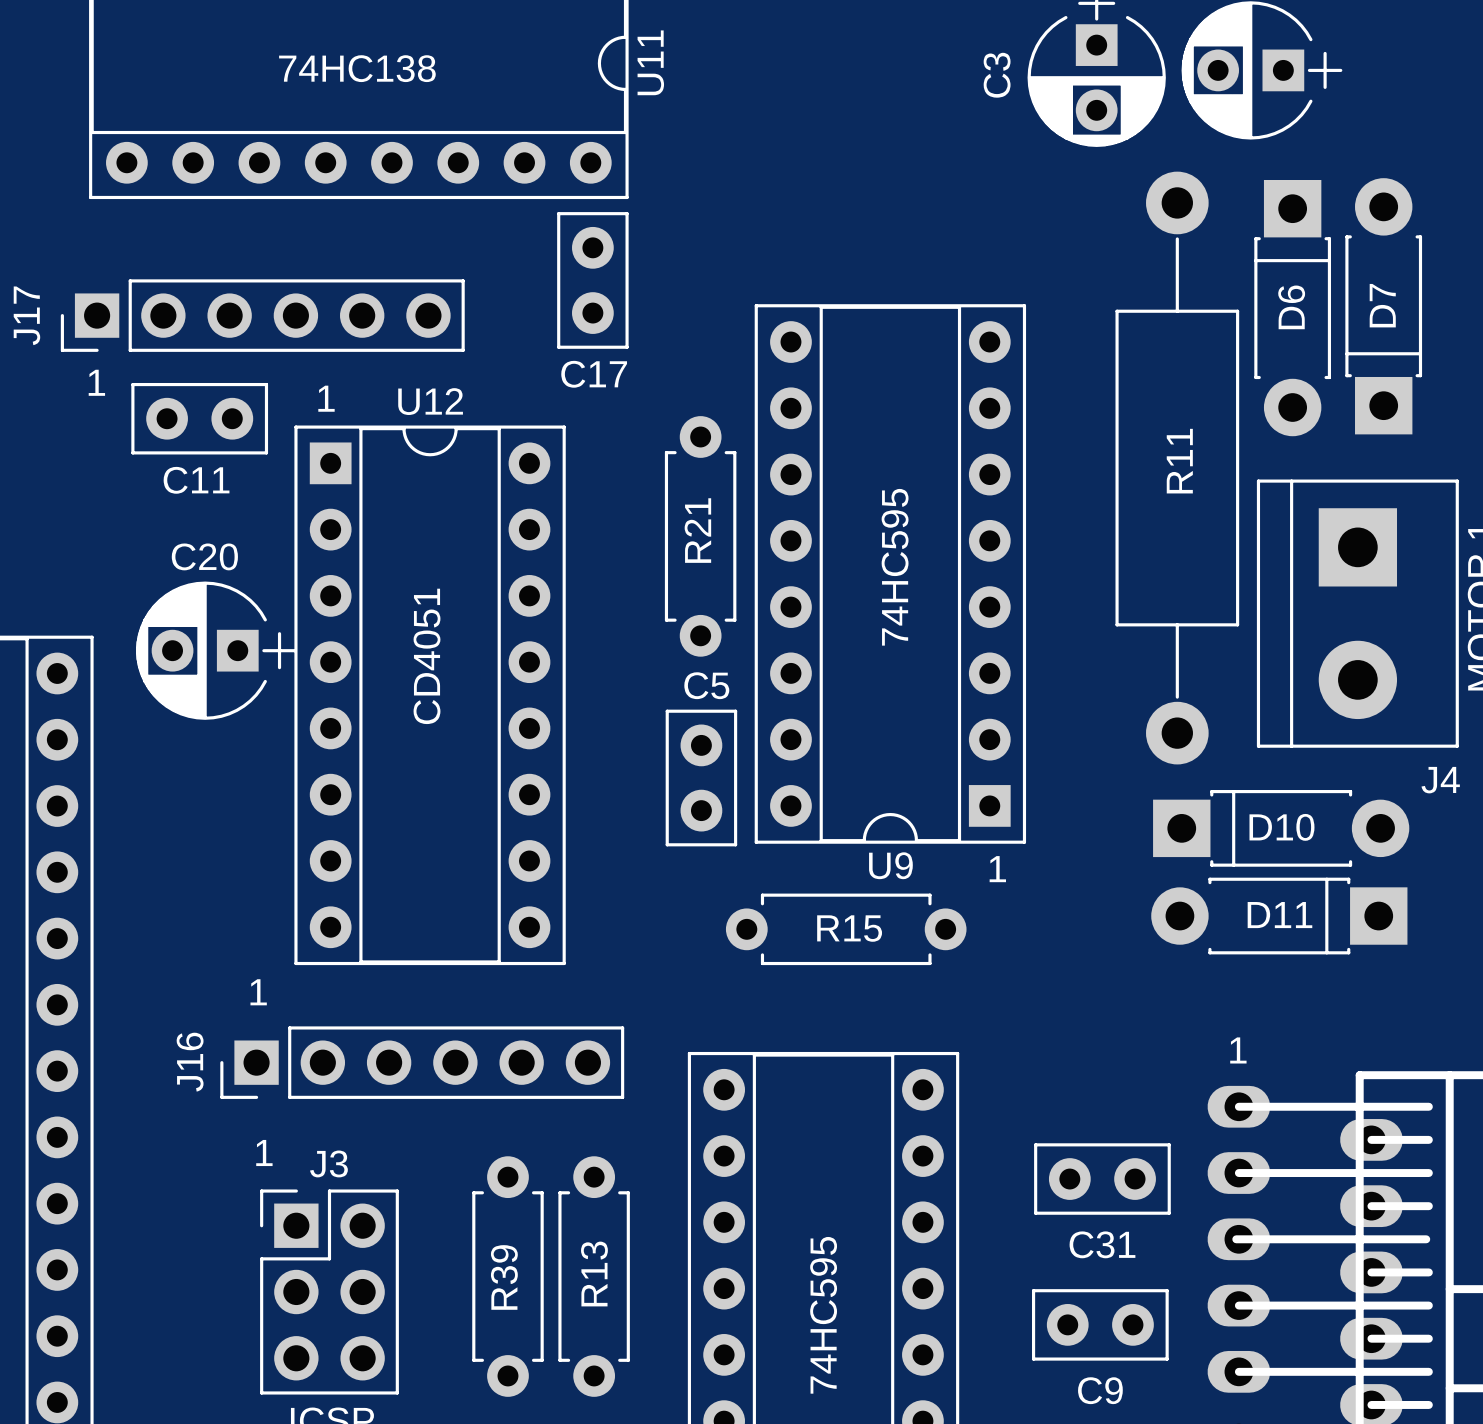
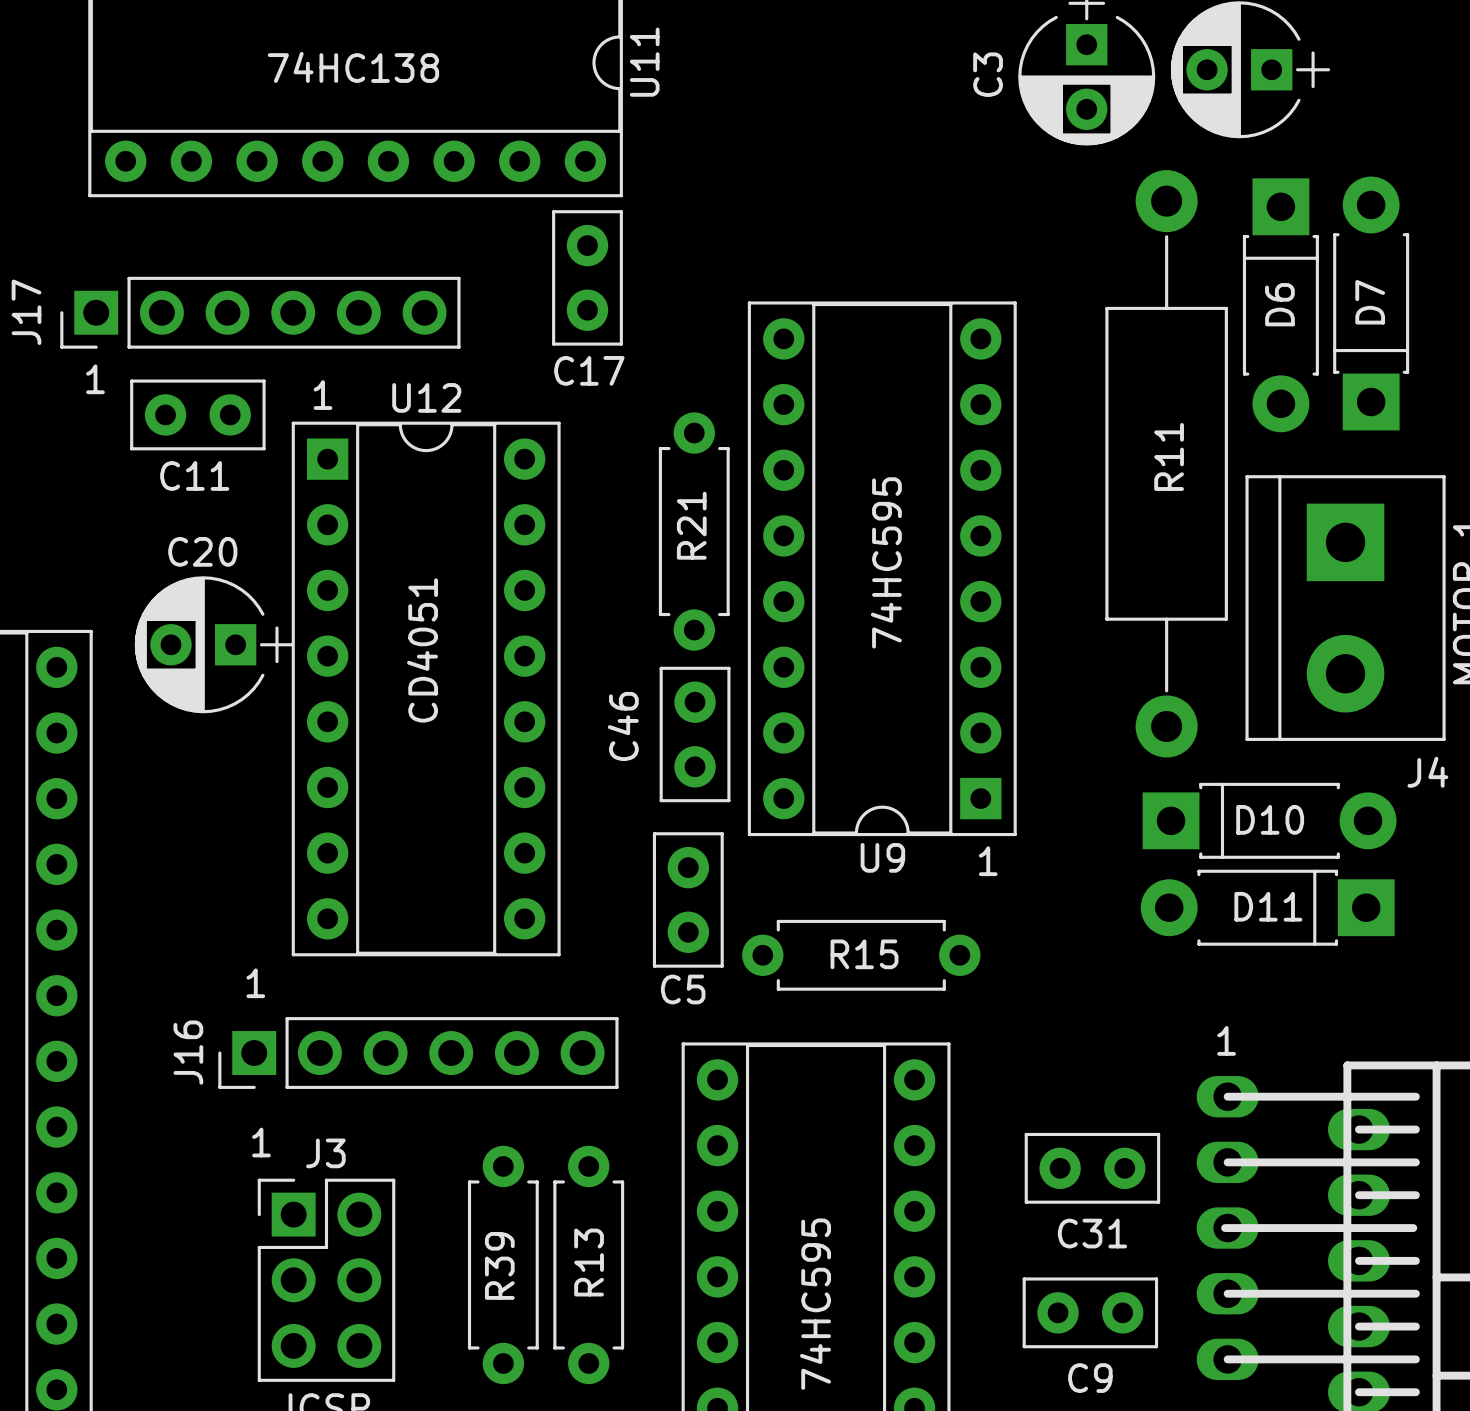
C5 name position: C5 (706, 685) -> C5 (683, 989)
C46: none -> (695, 734)
C5 position: (701, 778) -> (688, 899)
R15 position: (846, 929) -> (861, 955)

